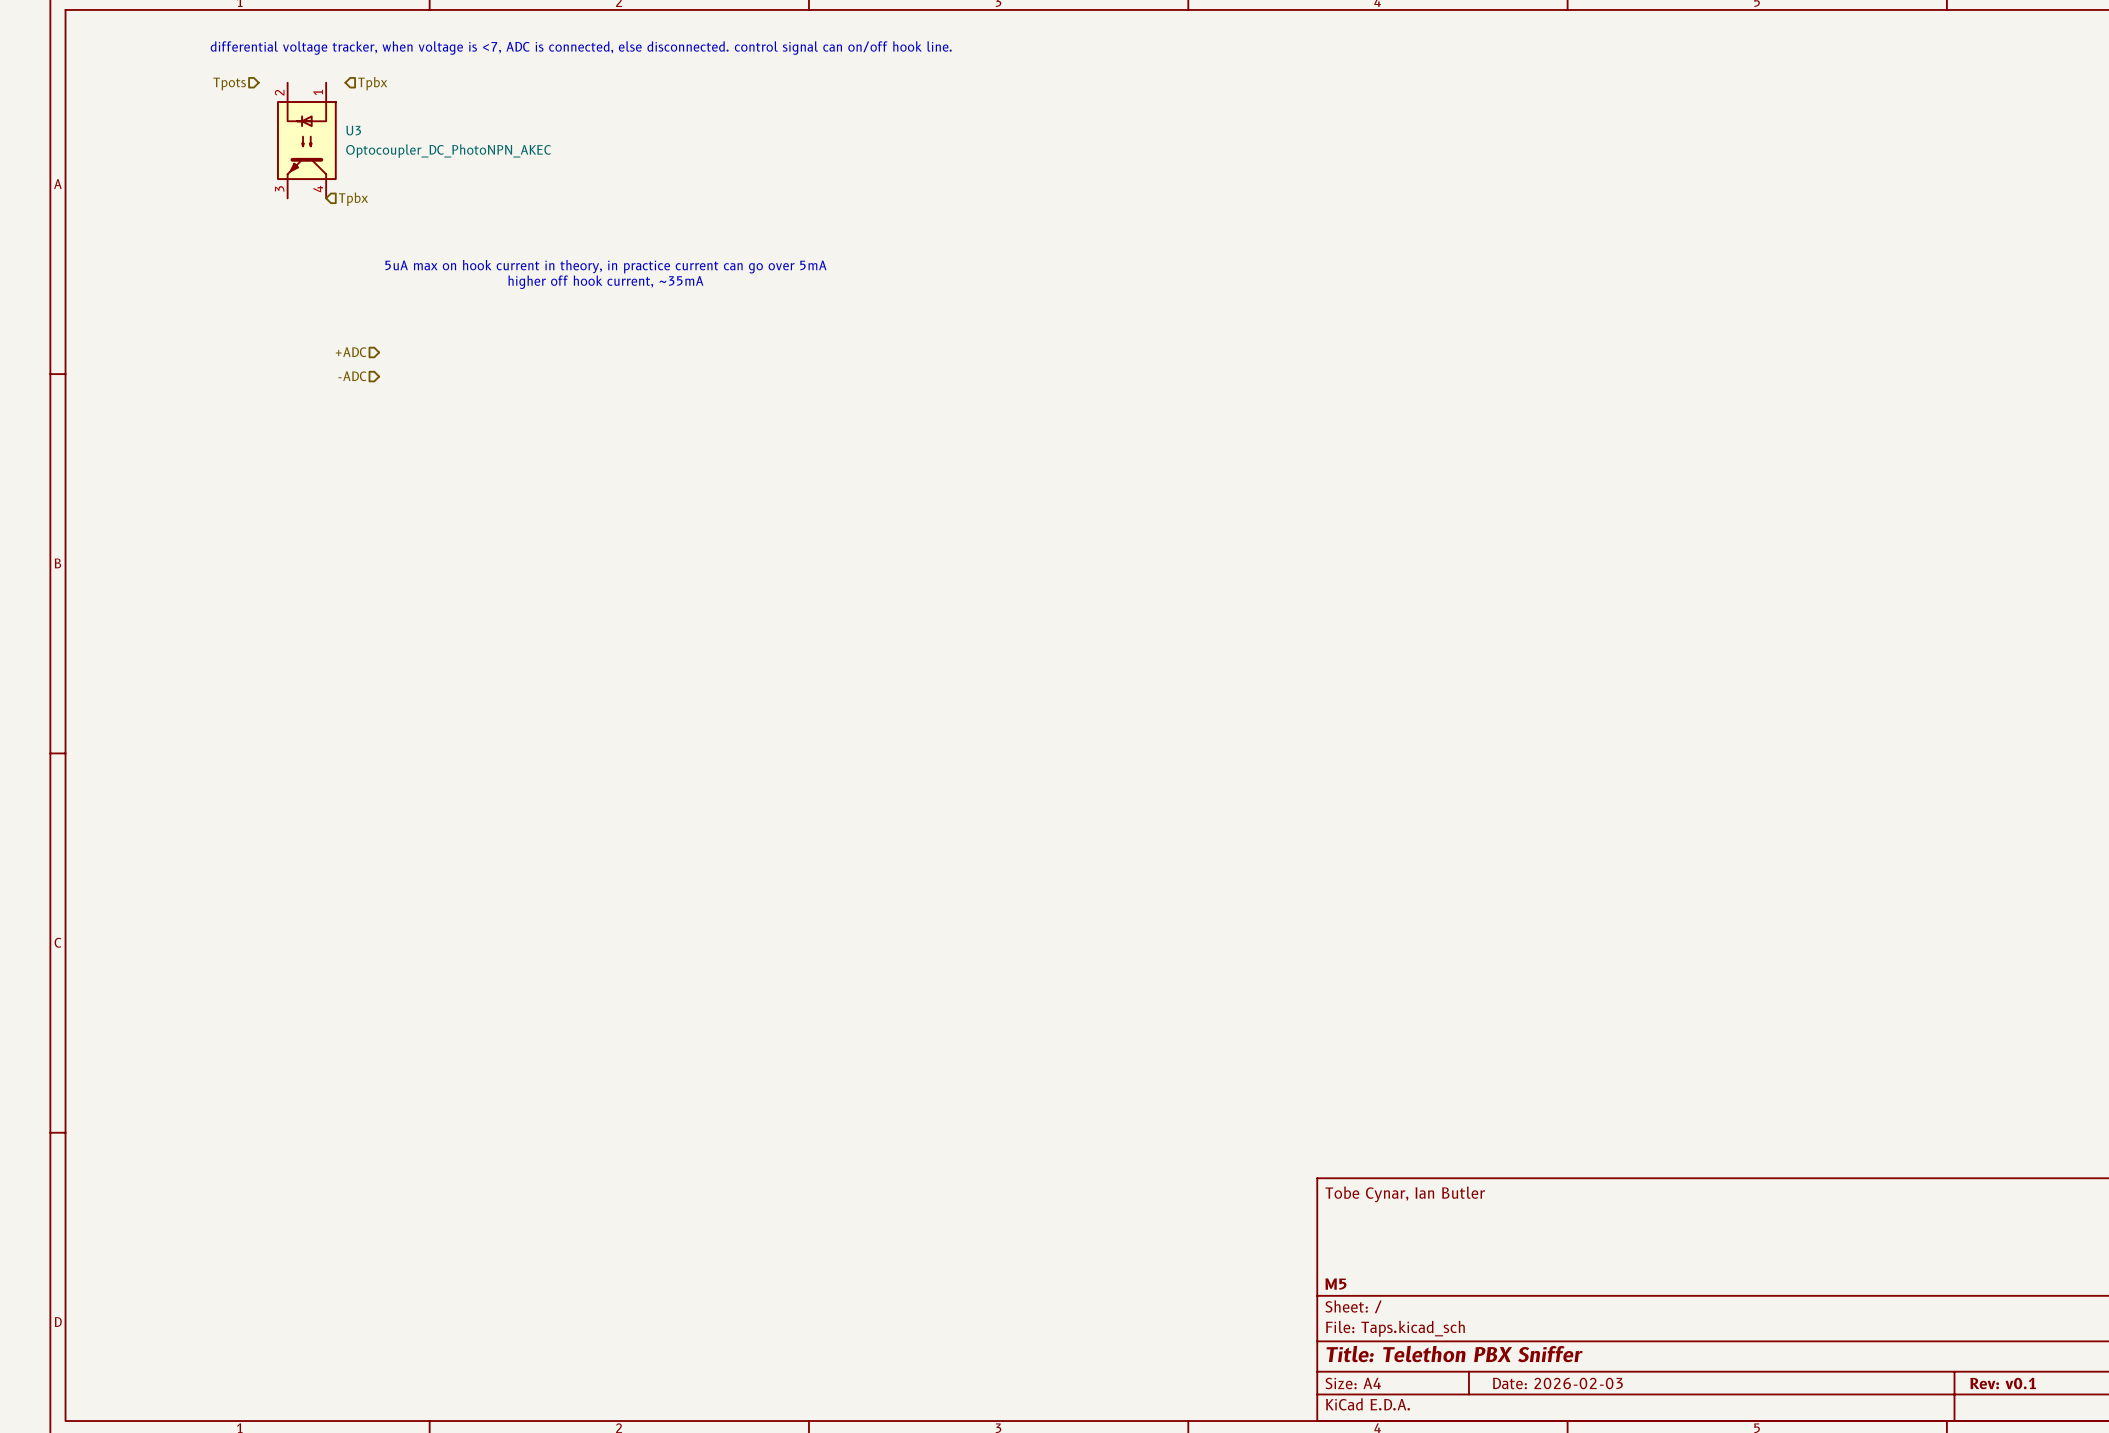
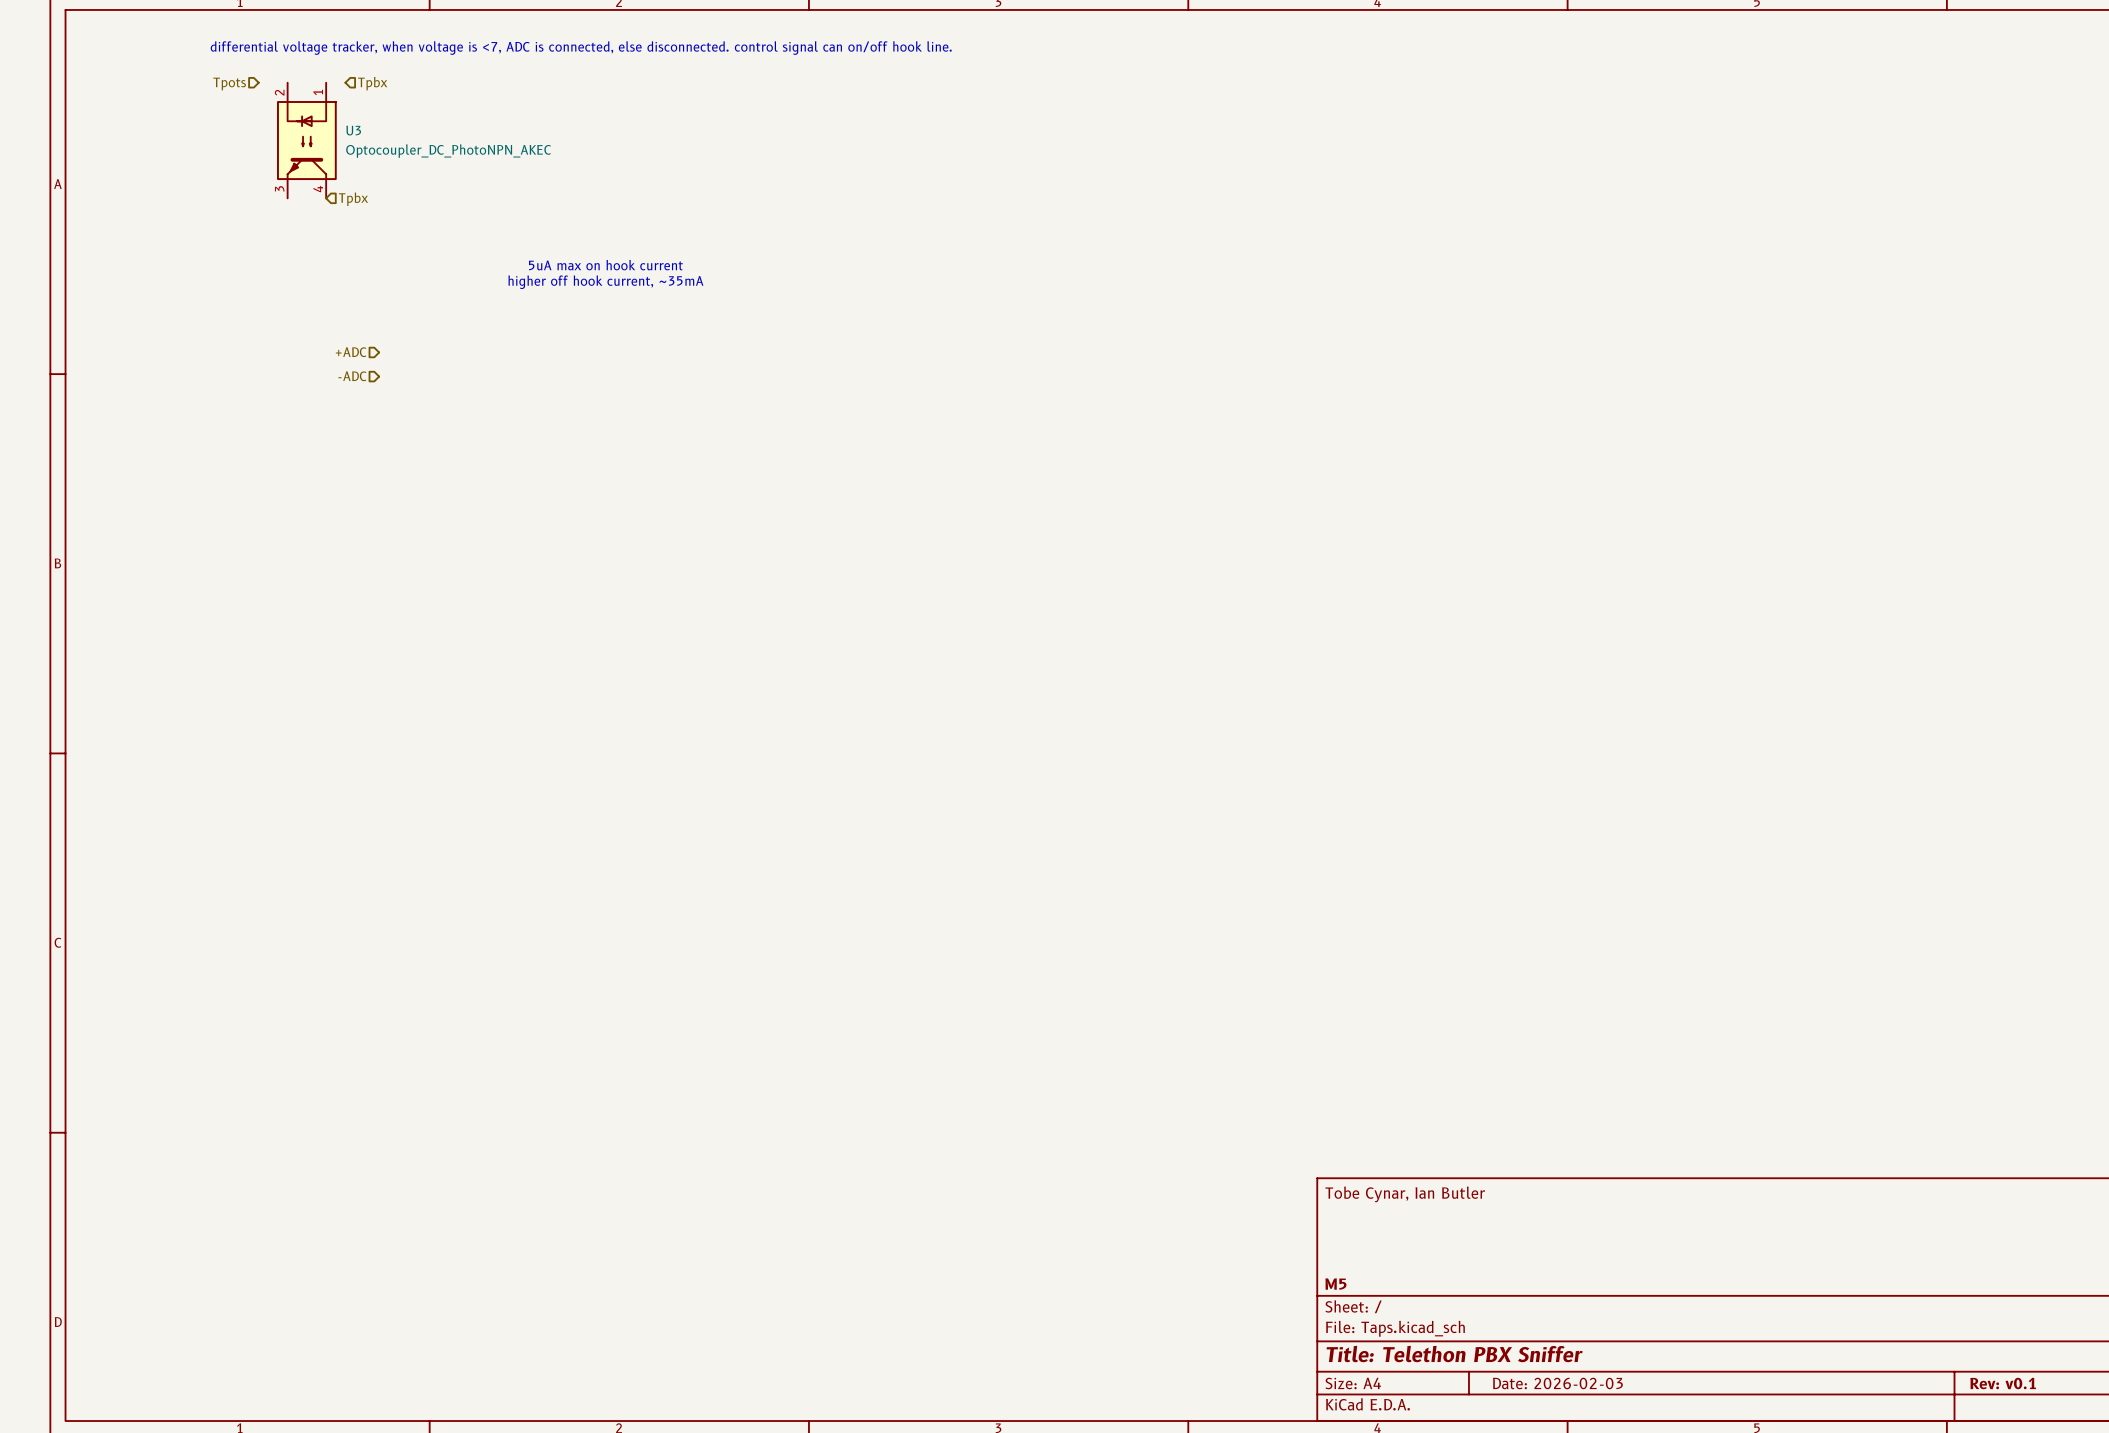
text: 5uA max on hook current in theory, in practice current can go over 5mA (605, 266) -> 5uA max on hook current (605, 265)

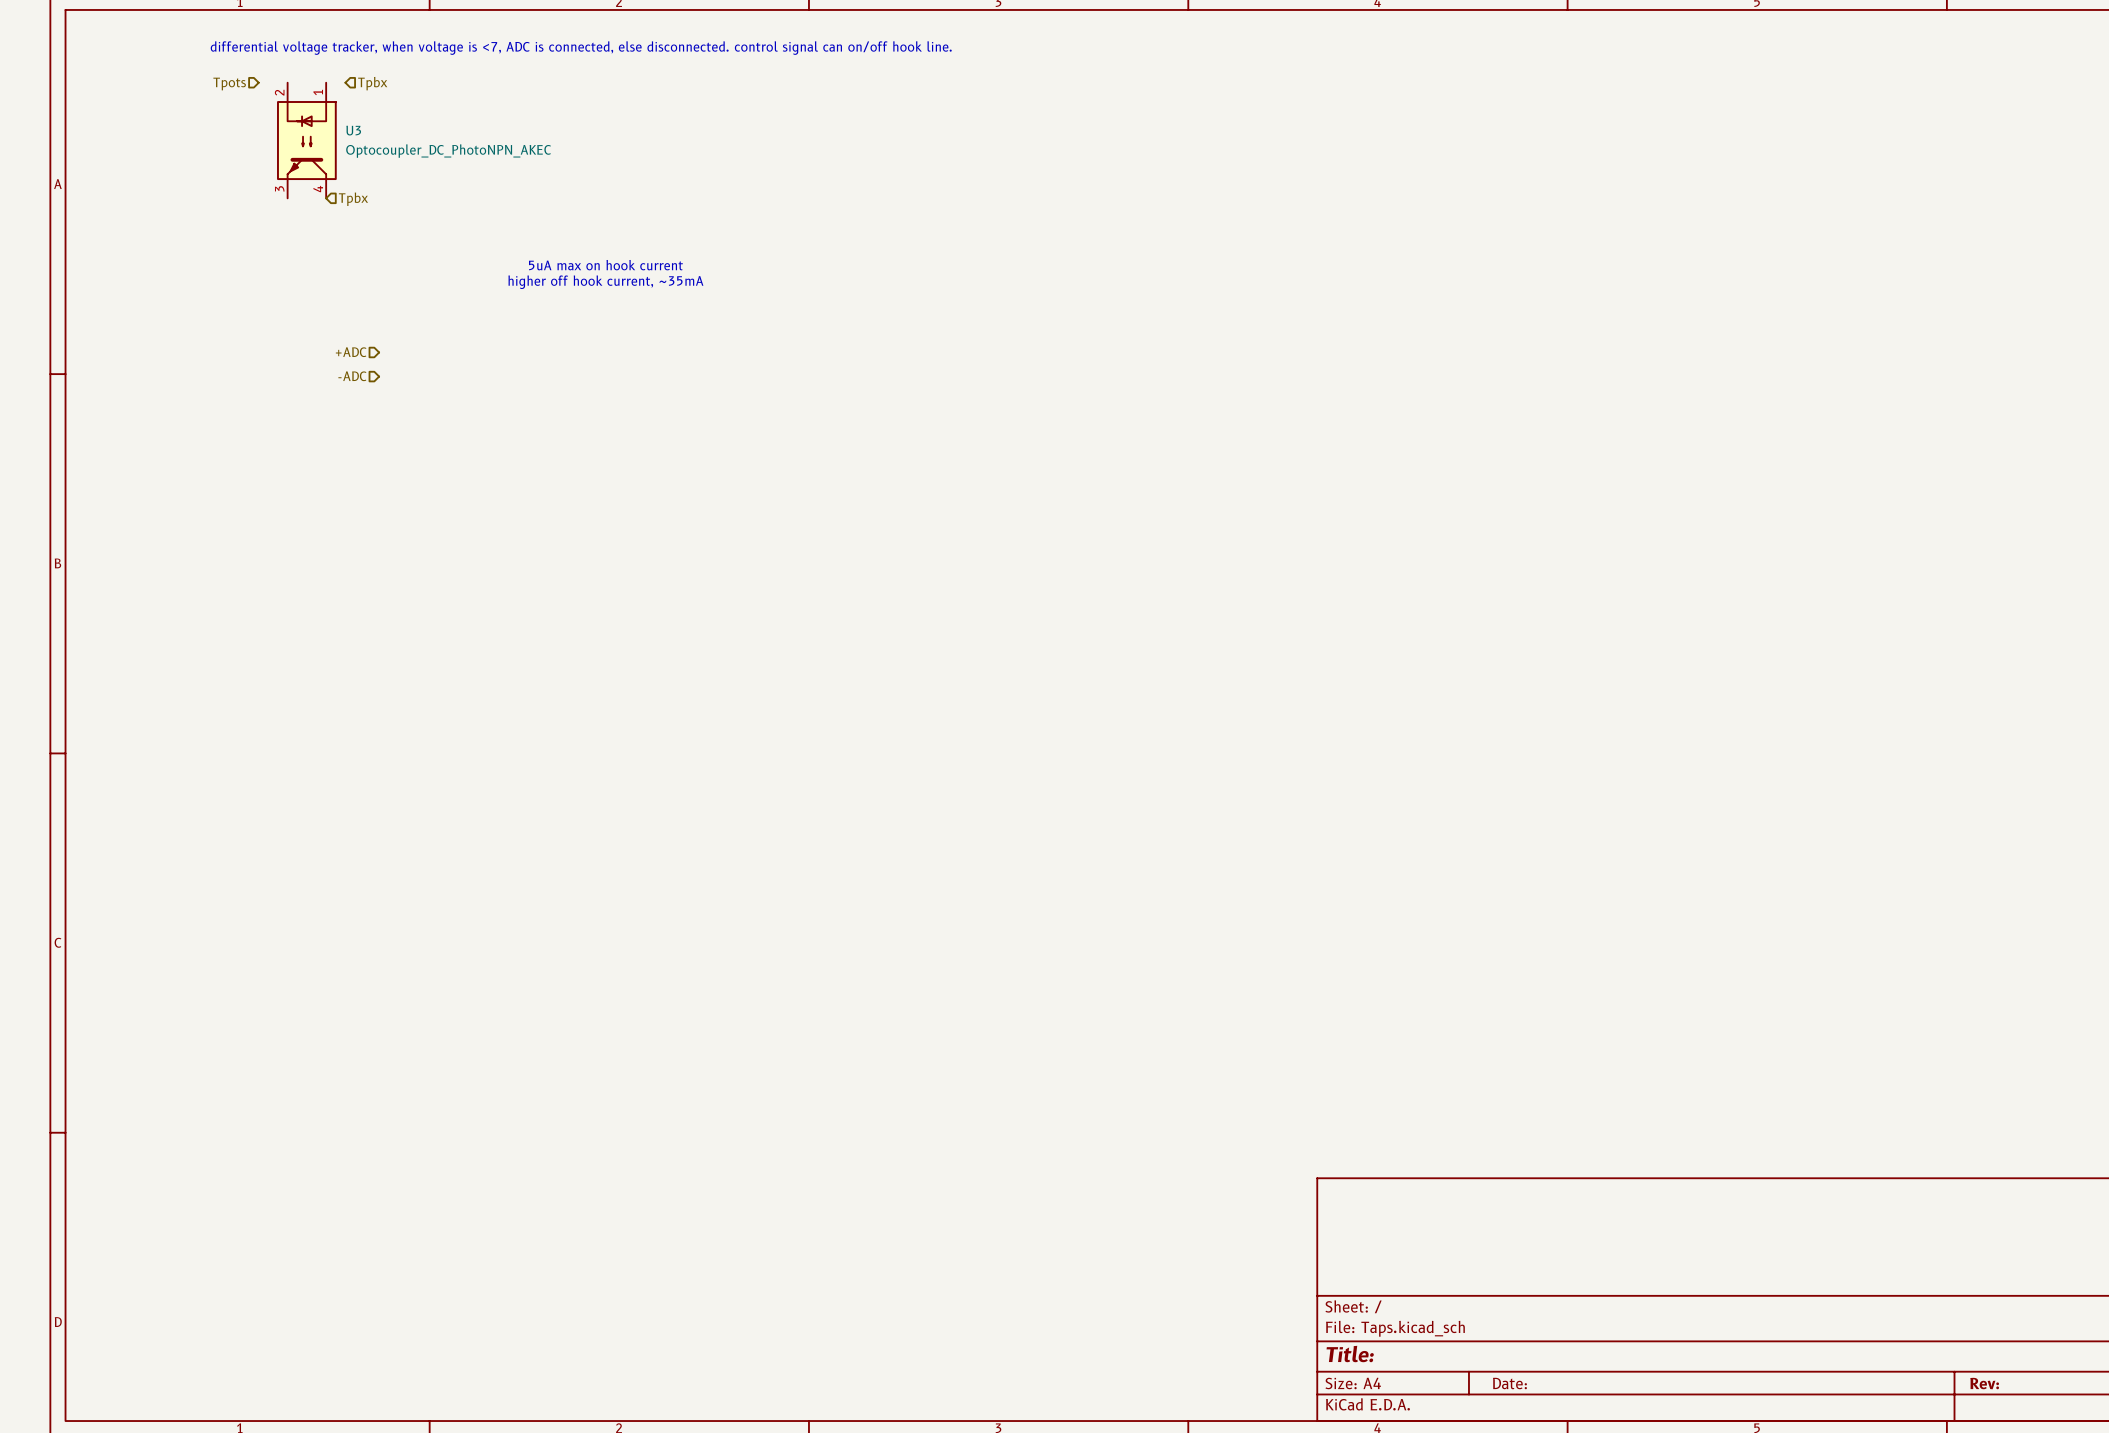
title block: Tobe Cynar, Ian Butler (1405, 1194) -> none
title block: M5 (1335, 1284) -> none
title block: Title: Telethon PBX Sniffer (1454, 1354) -> Title: (1350, 1354)
title block: Date: 2026-02-03 (1557, 1383) -> Date: (1509, 1383)
title block: Rev: v0.1 (2003, 1383) -> Rev: (1984, 1383)

